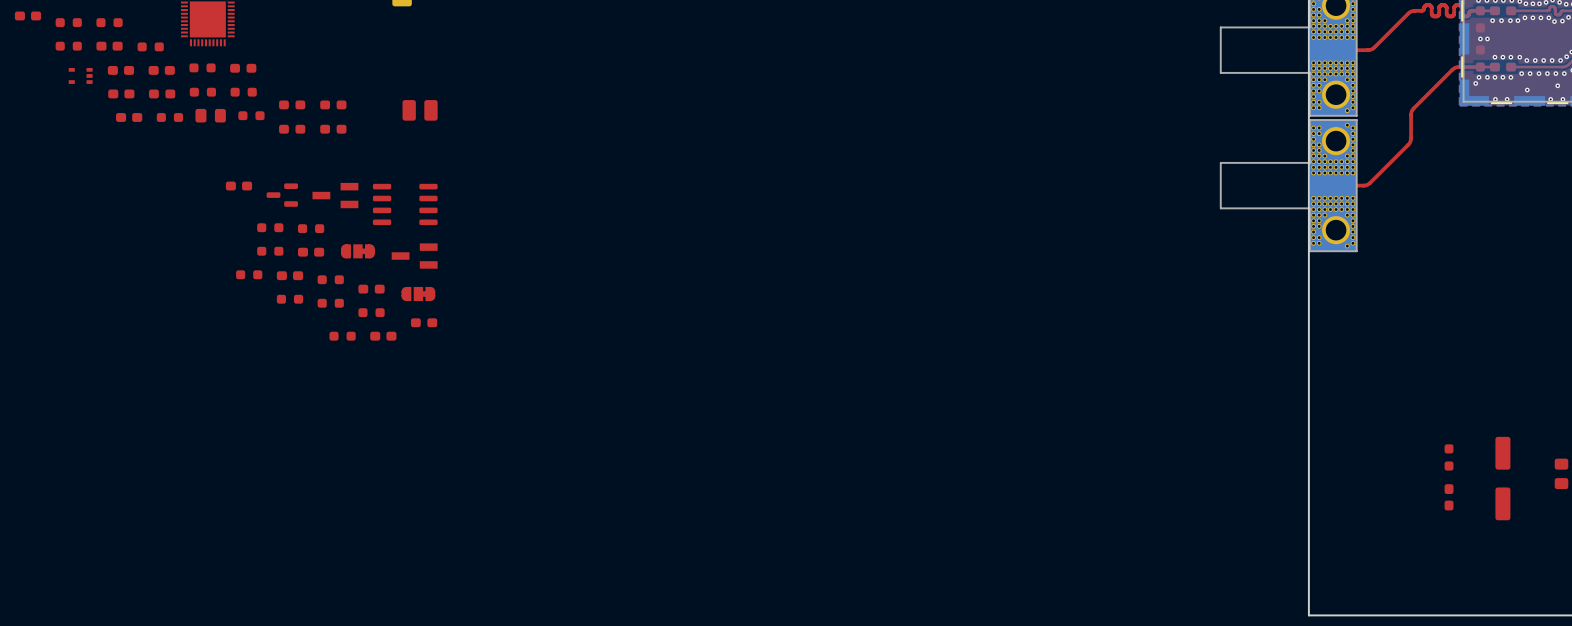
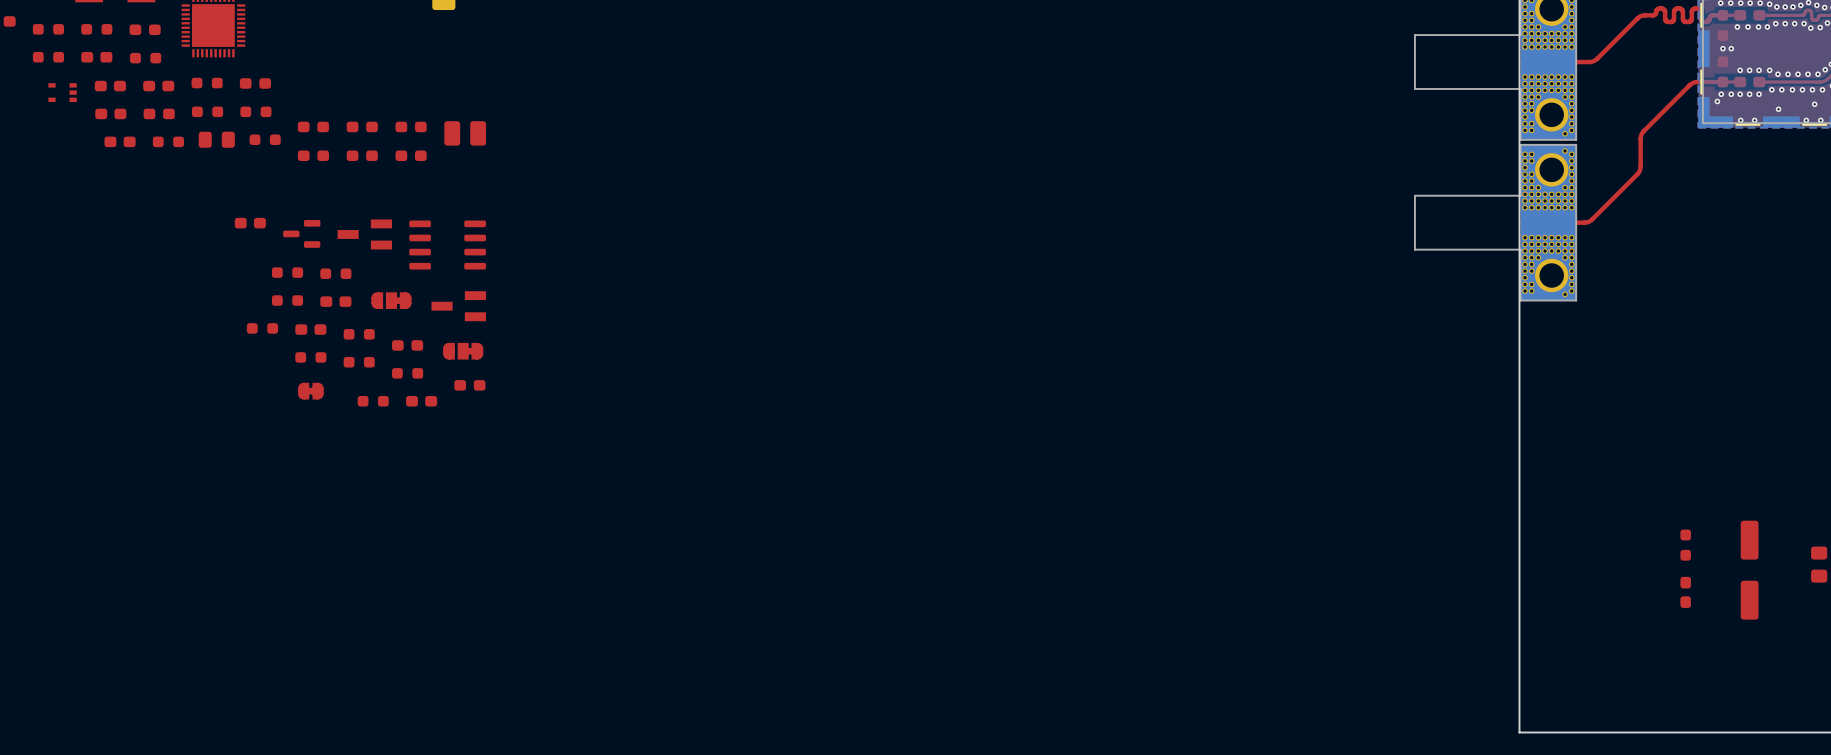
part: none -> (145, 29)
part: none -> (411, 126)
part: none -> (411, 155)
part: none -> (310, 391)

